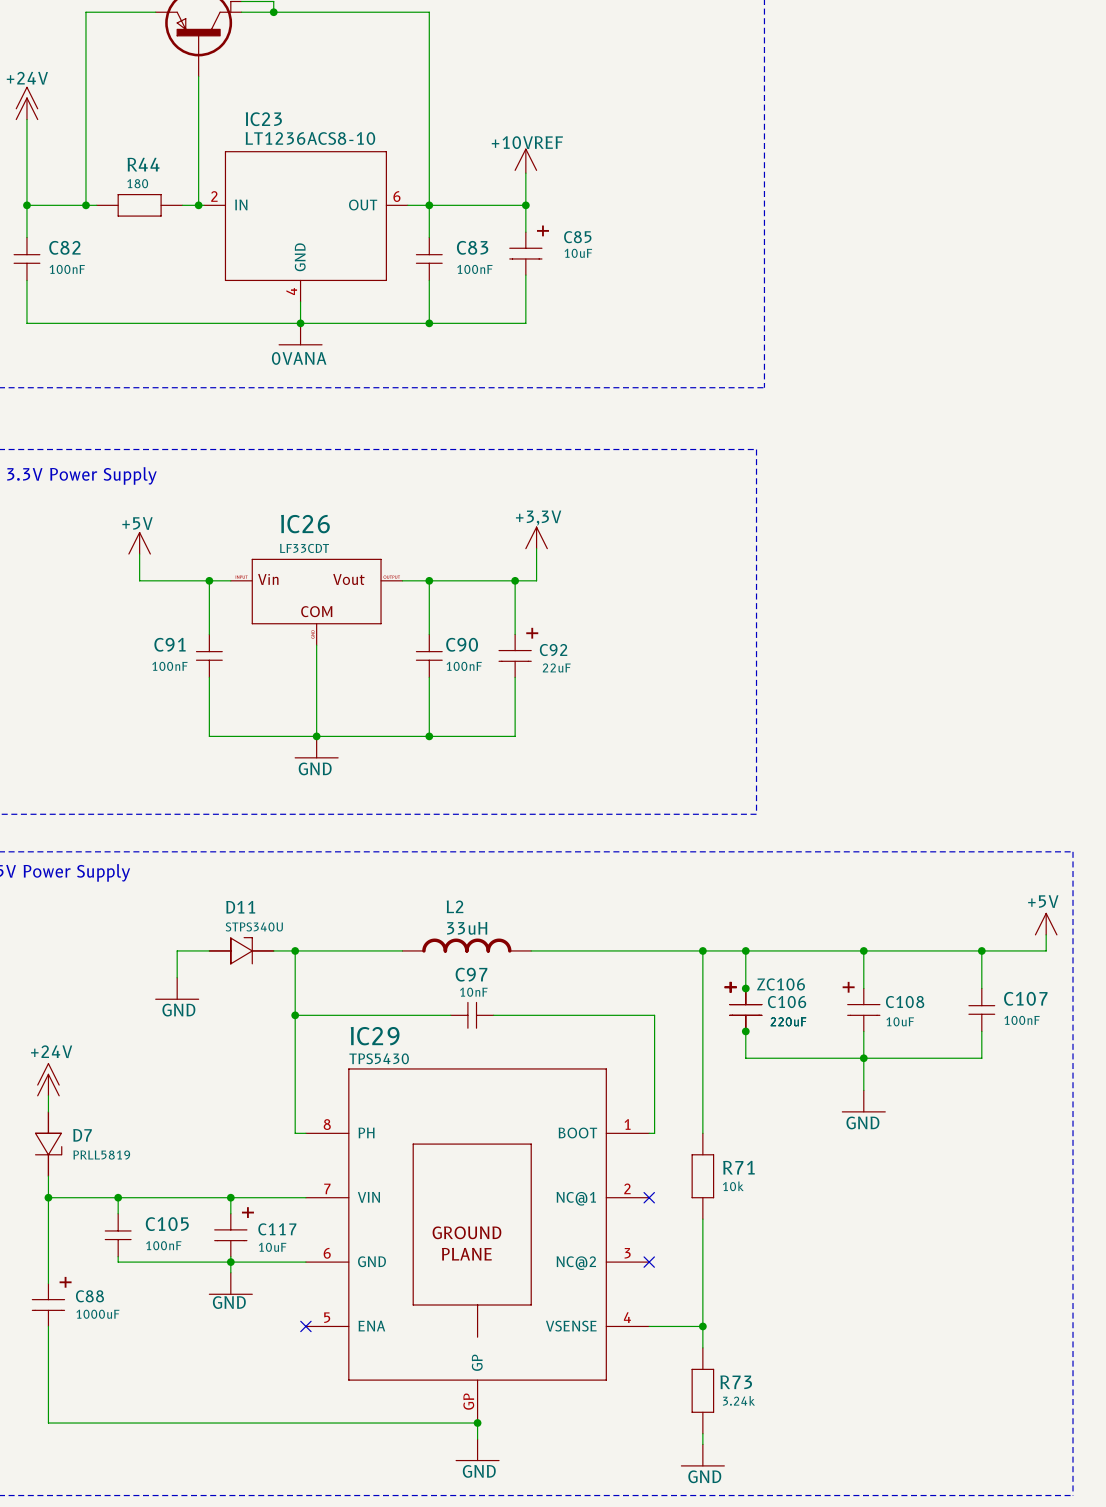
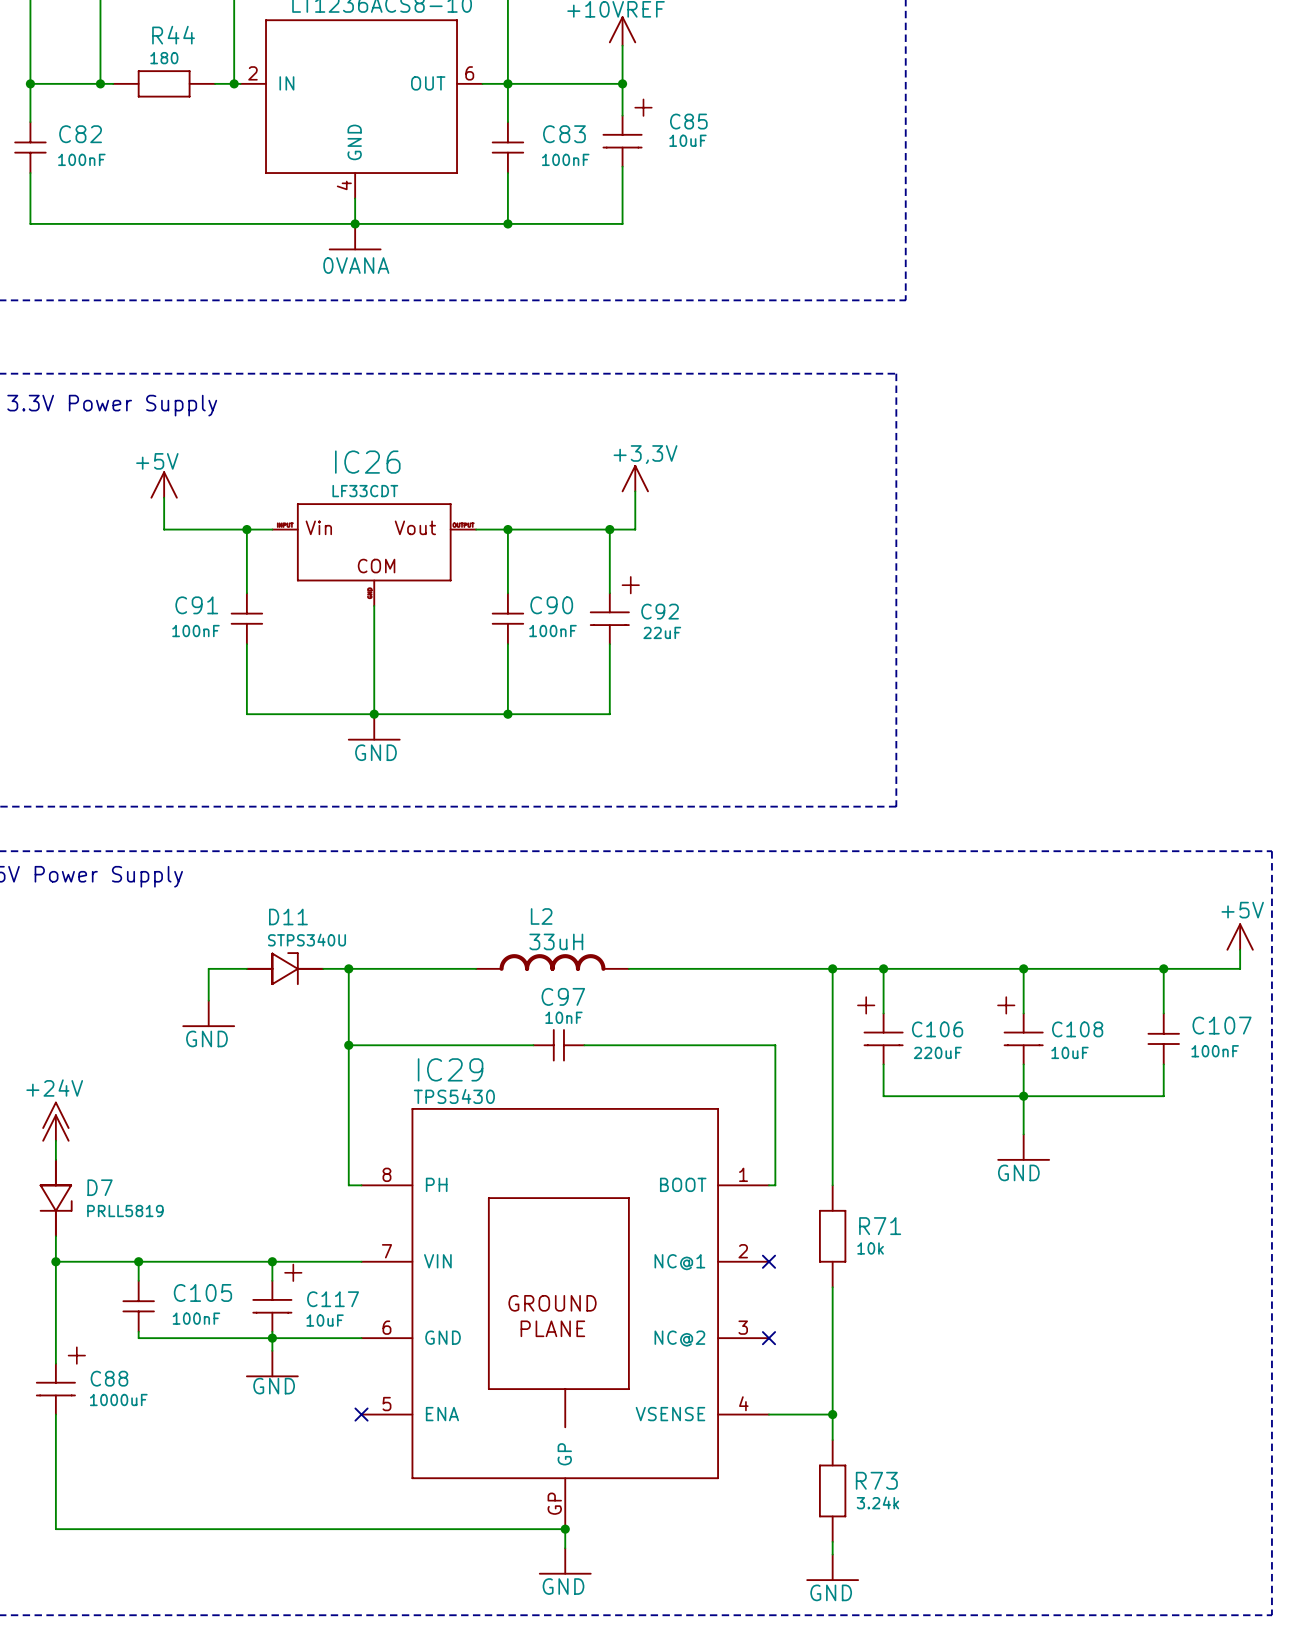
junction: (745, 988) -> none
ZC106: 220uF (745, 1009) -> none
junction: (745, 1031) -> none

